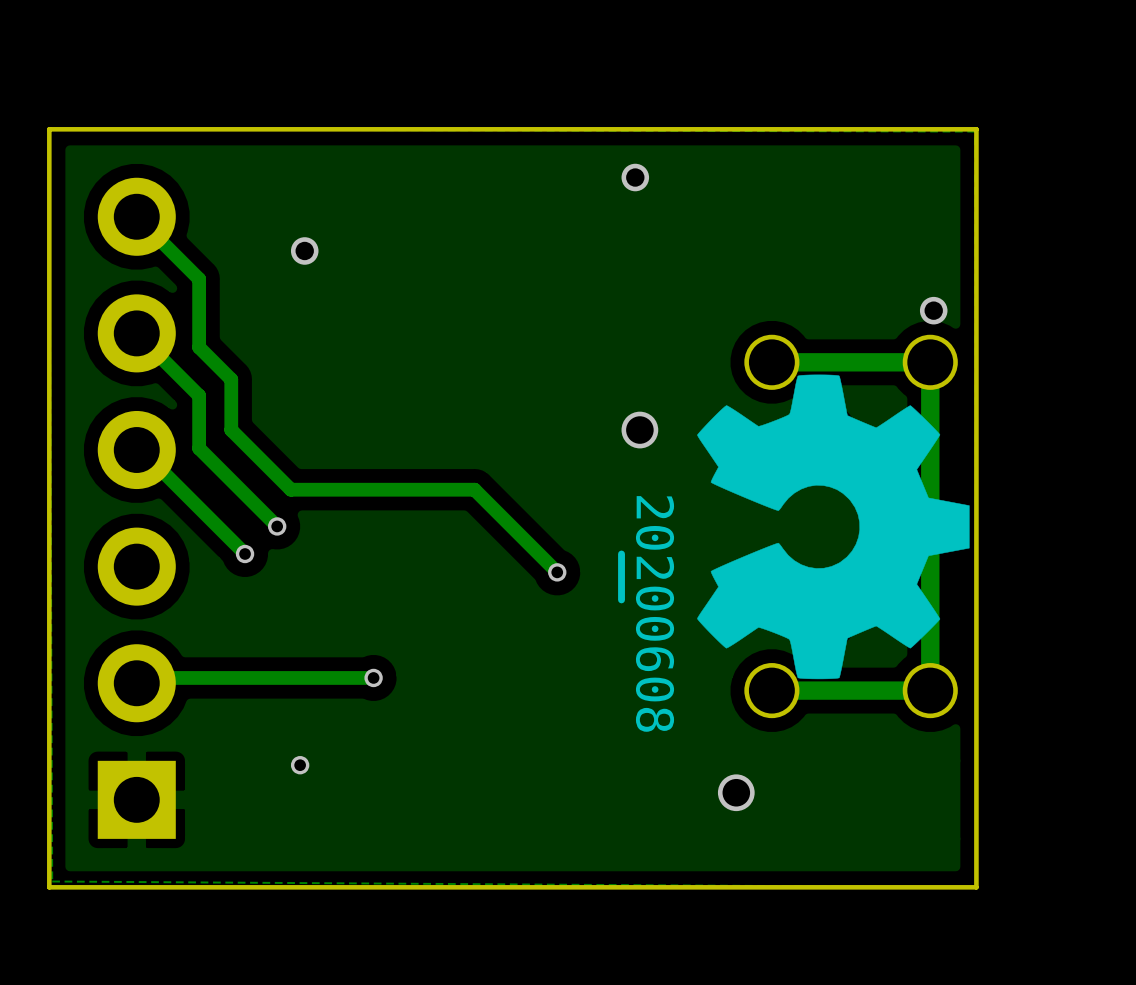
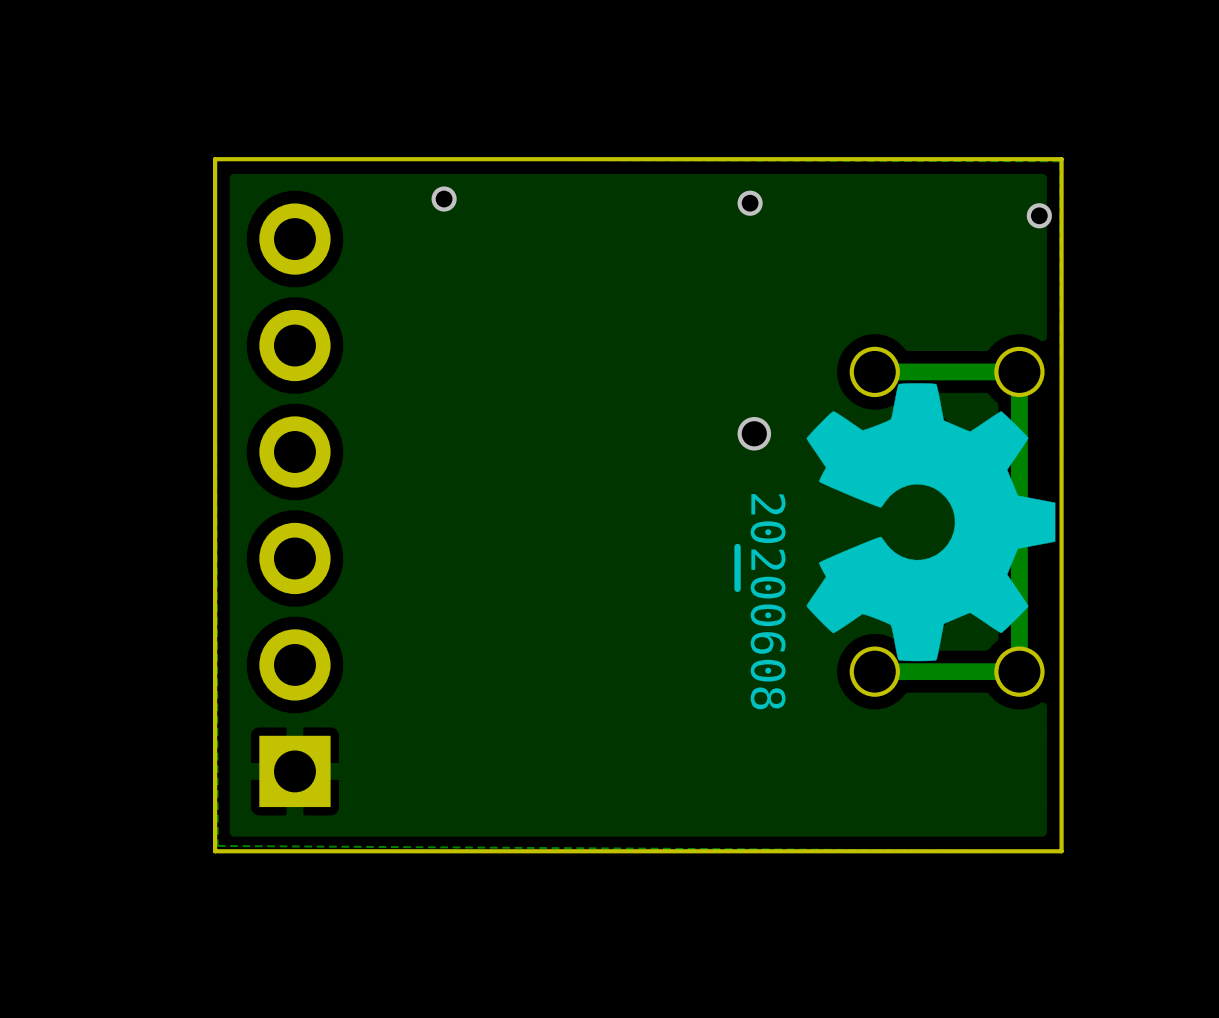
track: (136, 216) (199, 279) (199, 347) (231, 379) (231, 430) (290, 489) (474, 489) (557, 572) -> none
via position: (304, 250) -> (444, 199)
via position: (933, 310) -> (1039, 215)
track: (136, 333) (199, 395) (199, 448) (277, 526) -> none
track: (136, 450) (141, 450) (245, 553) -> none
via: (277, 526) -> none
via: (245, 554) -> none
via: (557, 572) -> none
track: (373, 677) (142, 677) (136, 683) -> none
via: (373, 677) -> none
via: (300, 765) -> none
via: (736, 792) -> none

